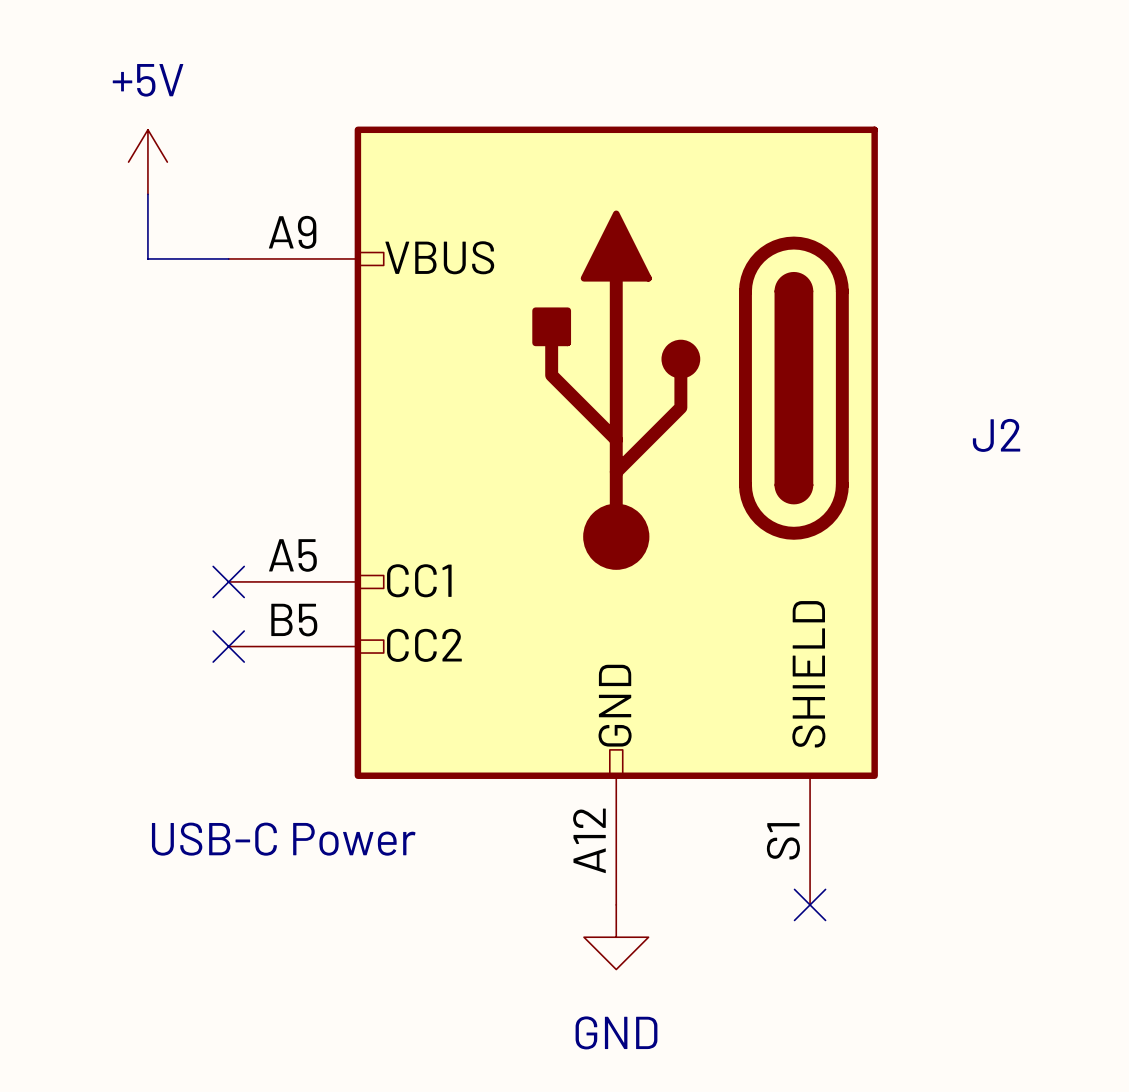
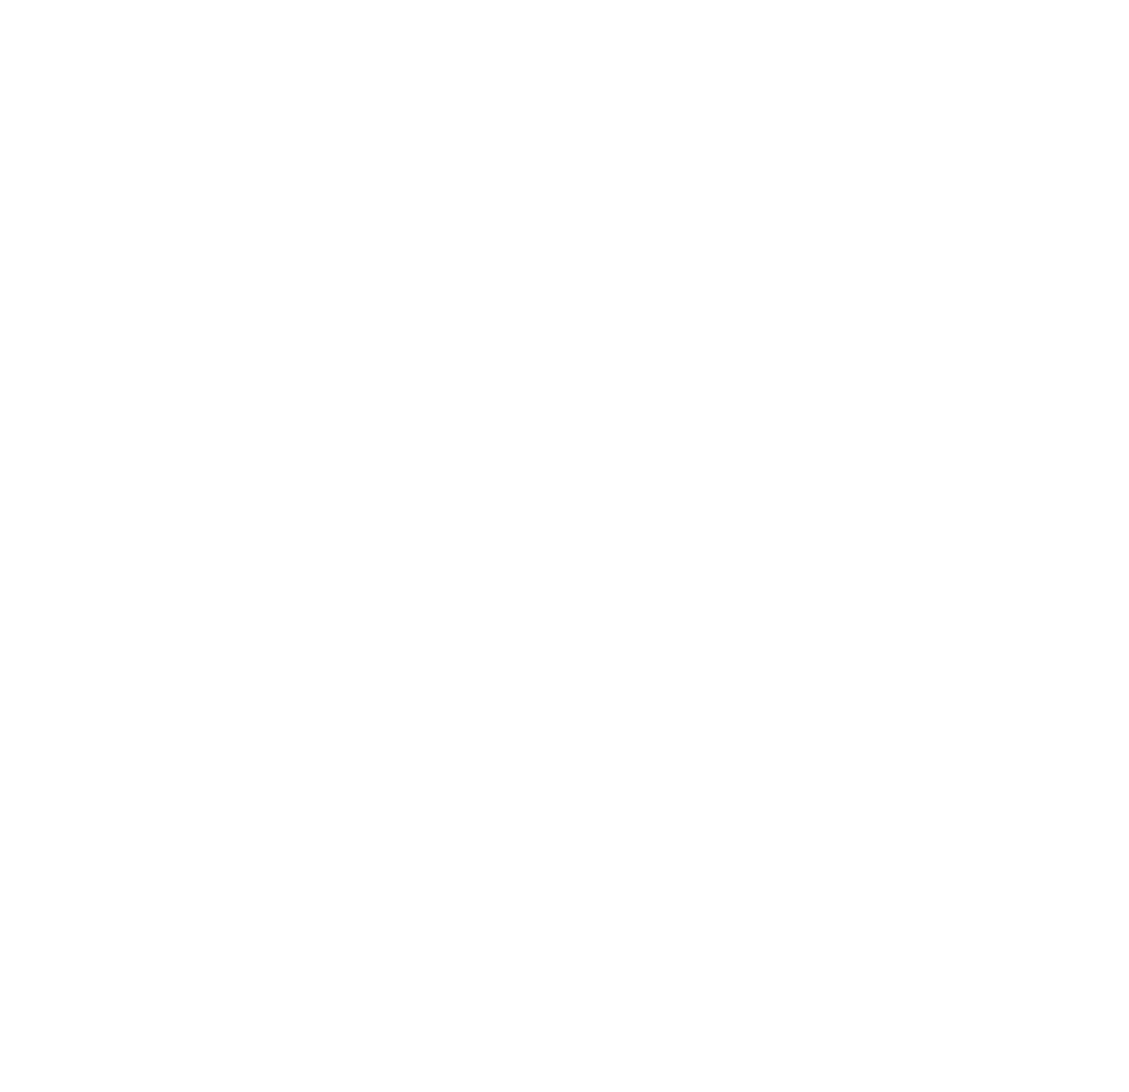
power symbol: +5V (147, 162) -> none
wire: (147, 194) (147, 258) (228, 258) -> none
J2: USB-C Power (553, 515) -> none
no-connect mark: (228, 581) -> none
no-connect mark: (228, 646) -> none
no-connect mark: (810, 904) -> none
power symbol: GND (616, 937) -> none

